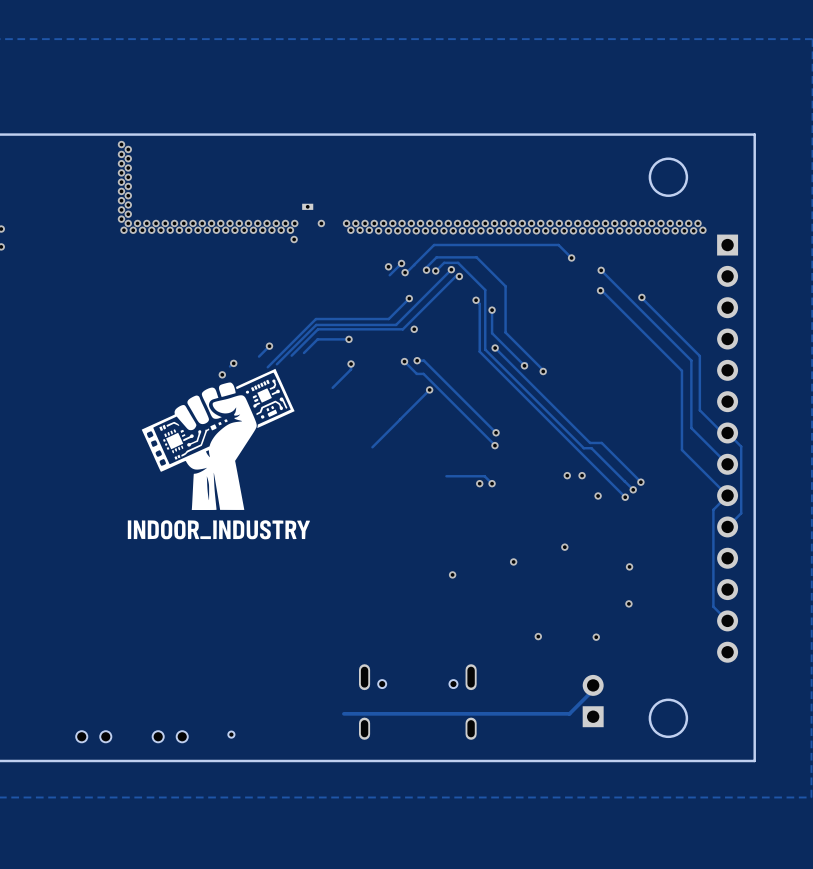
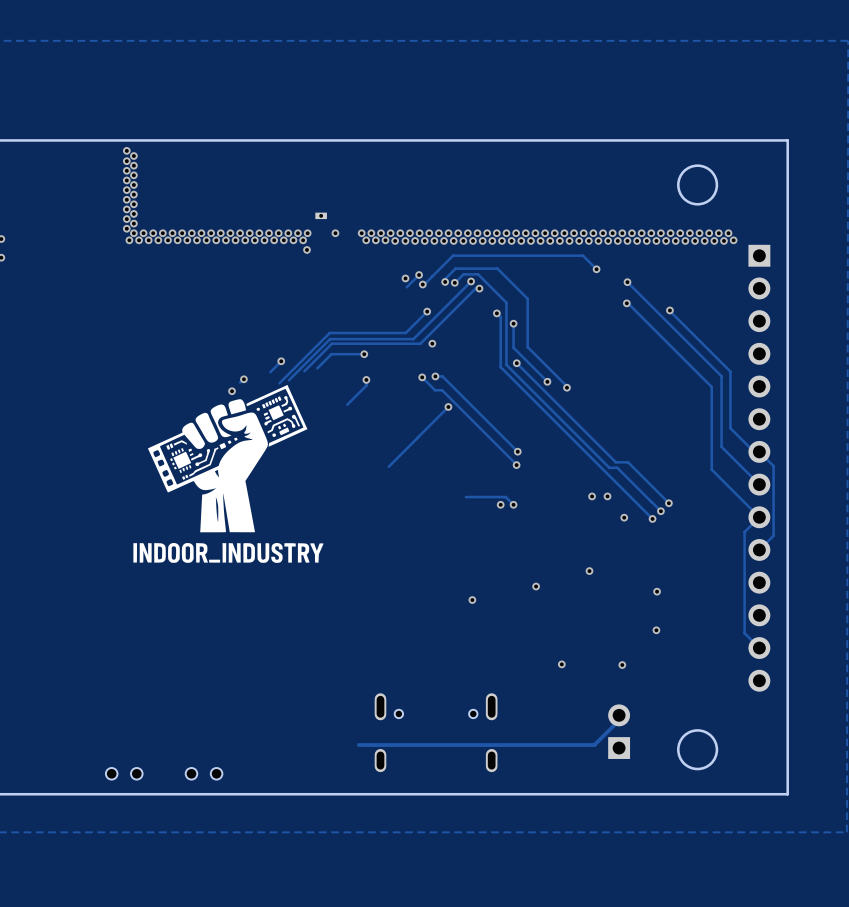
part: (231, 734) -> none
part: (93, 736) -> none
part: (170, 736) -> none
part: none -> (124, 773)
part: none -> (204, 773)

